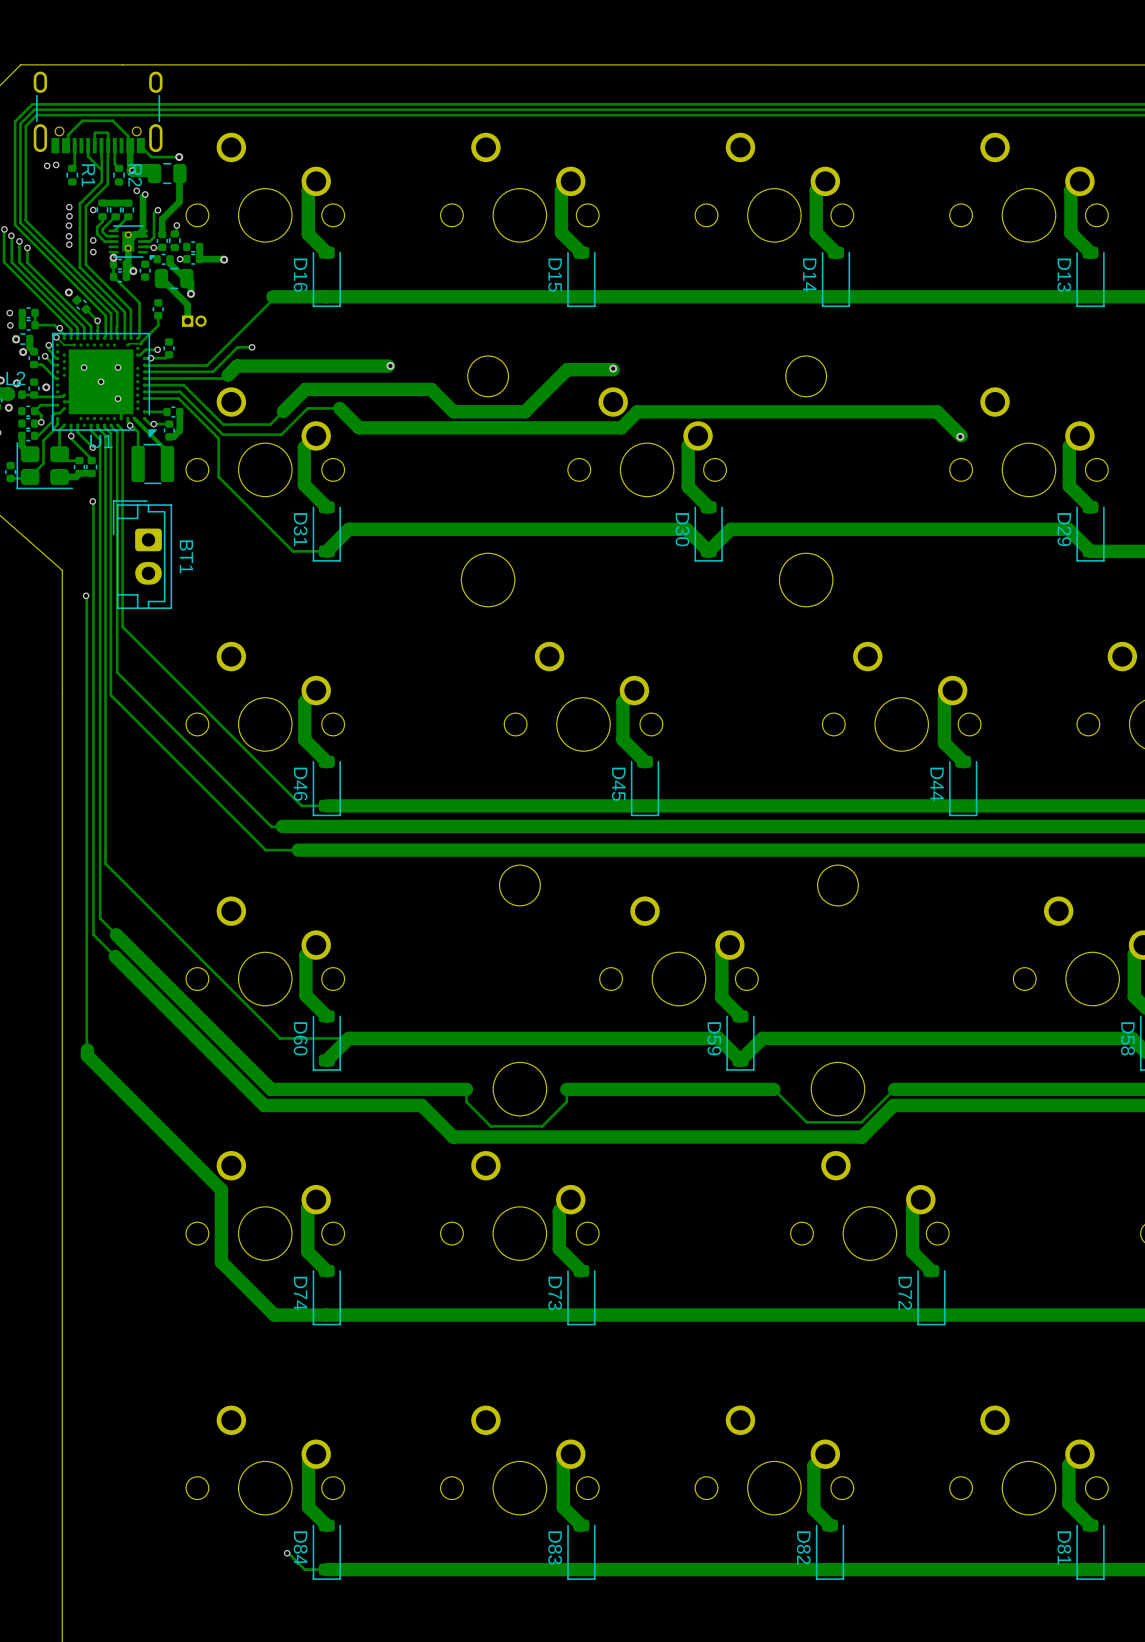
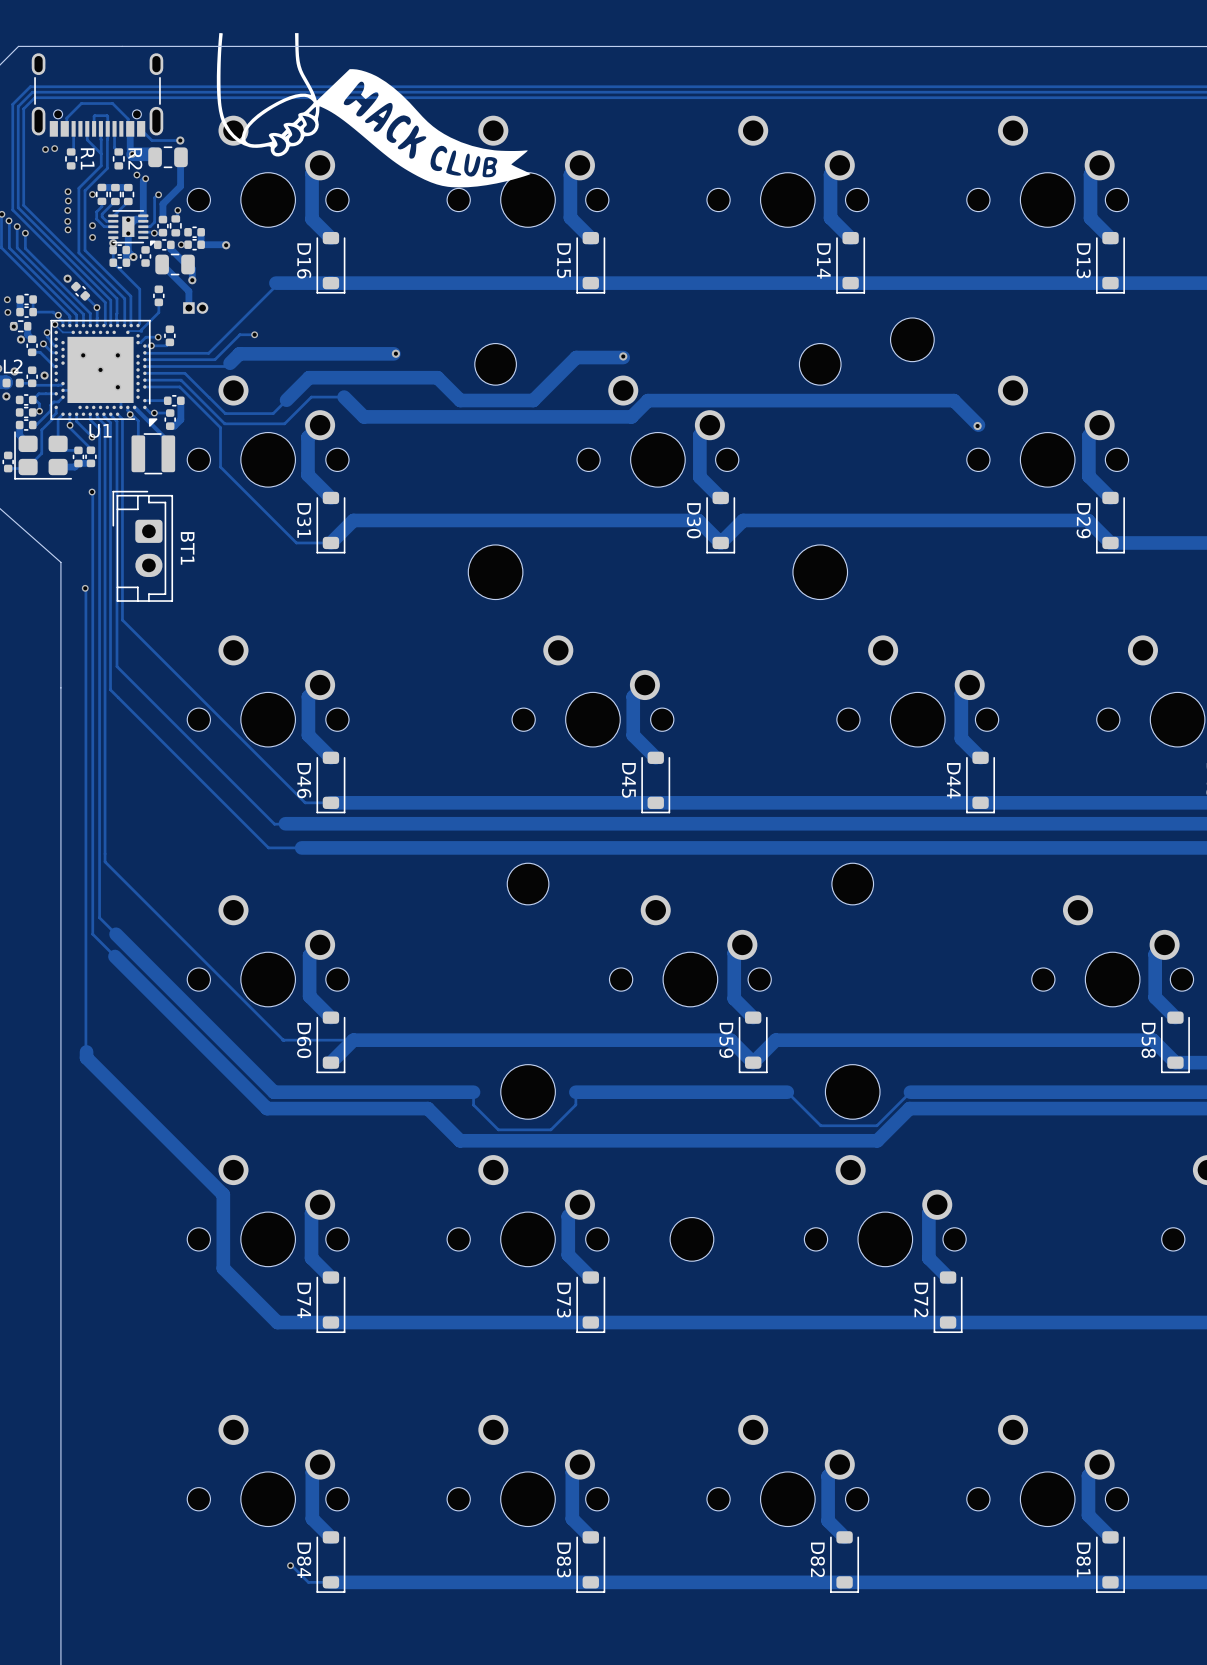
drawing: none -> [216, 33, 531, 188]
part: none -> (912, 339)
part: none -> (691, 1239)

